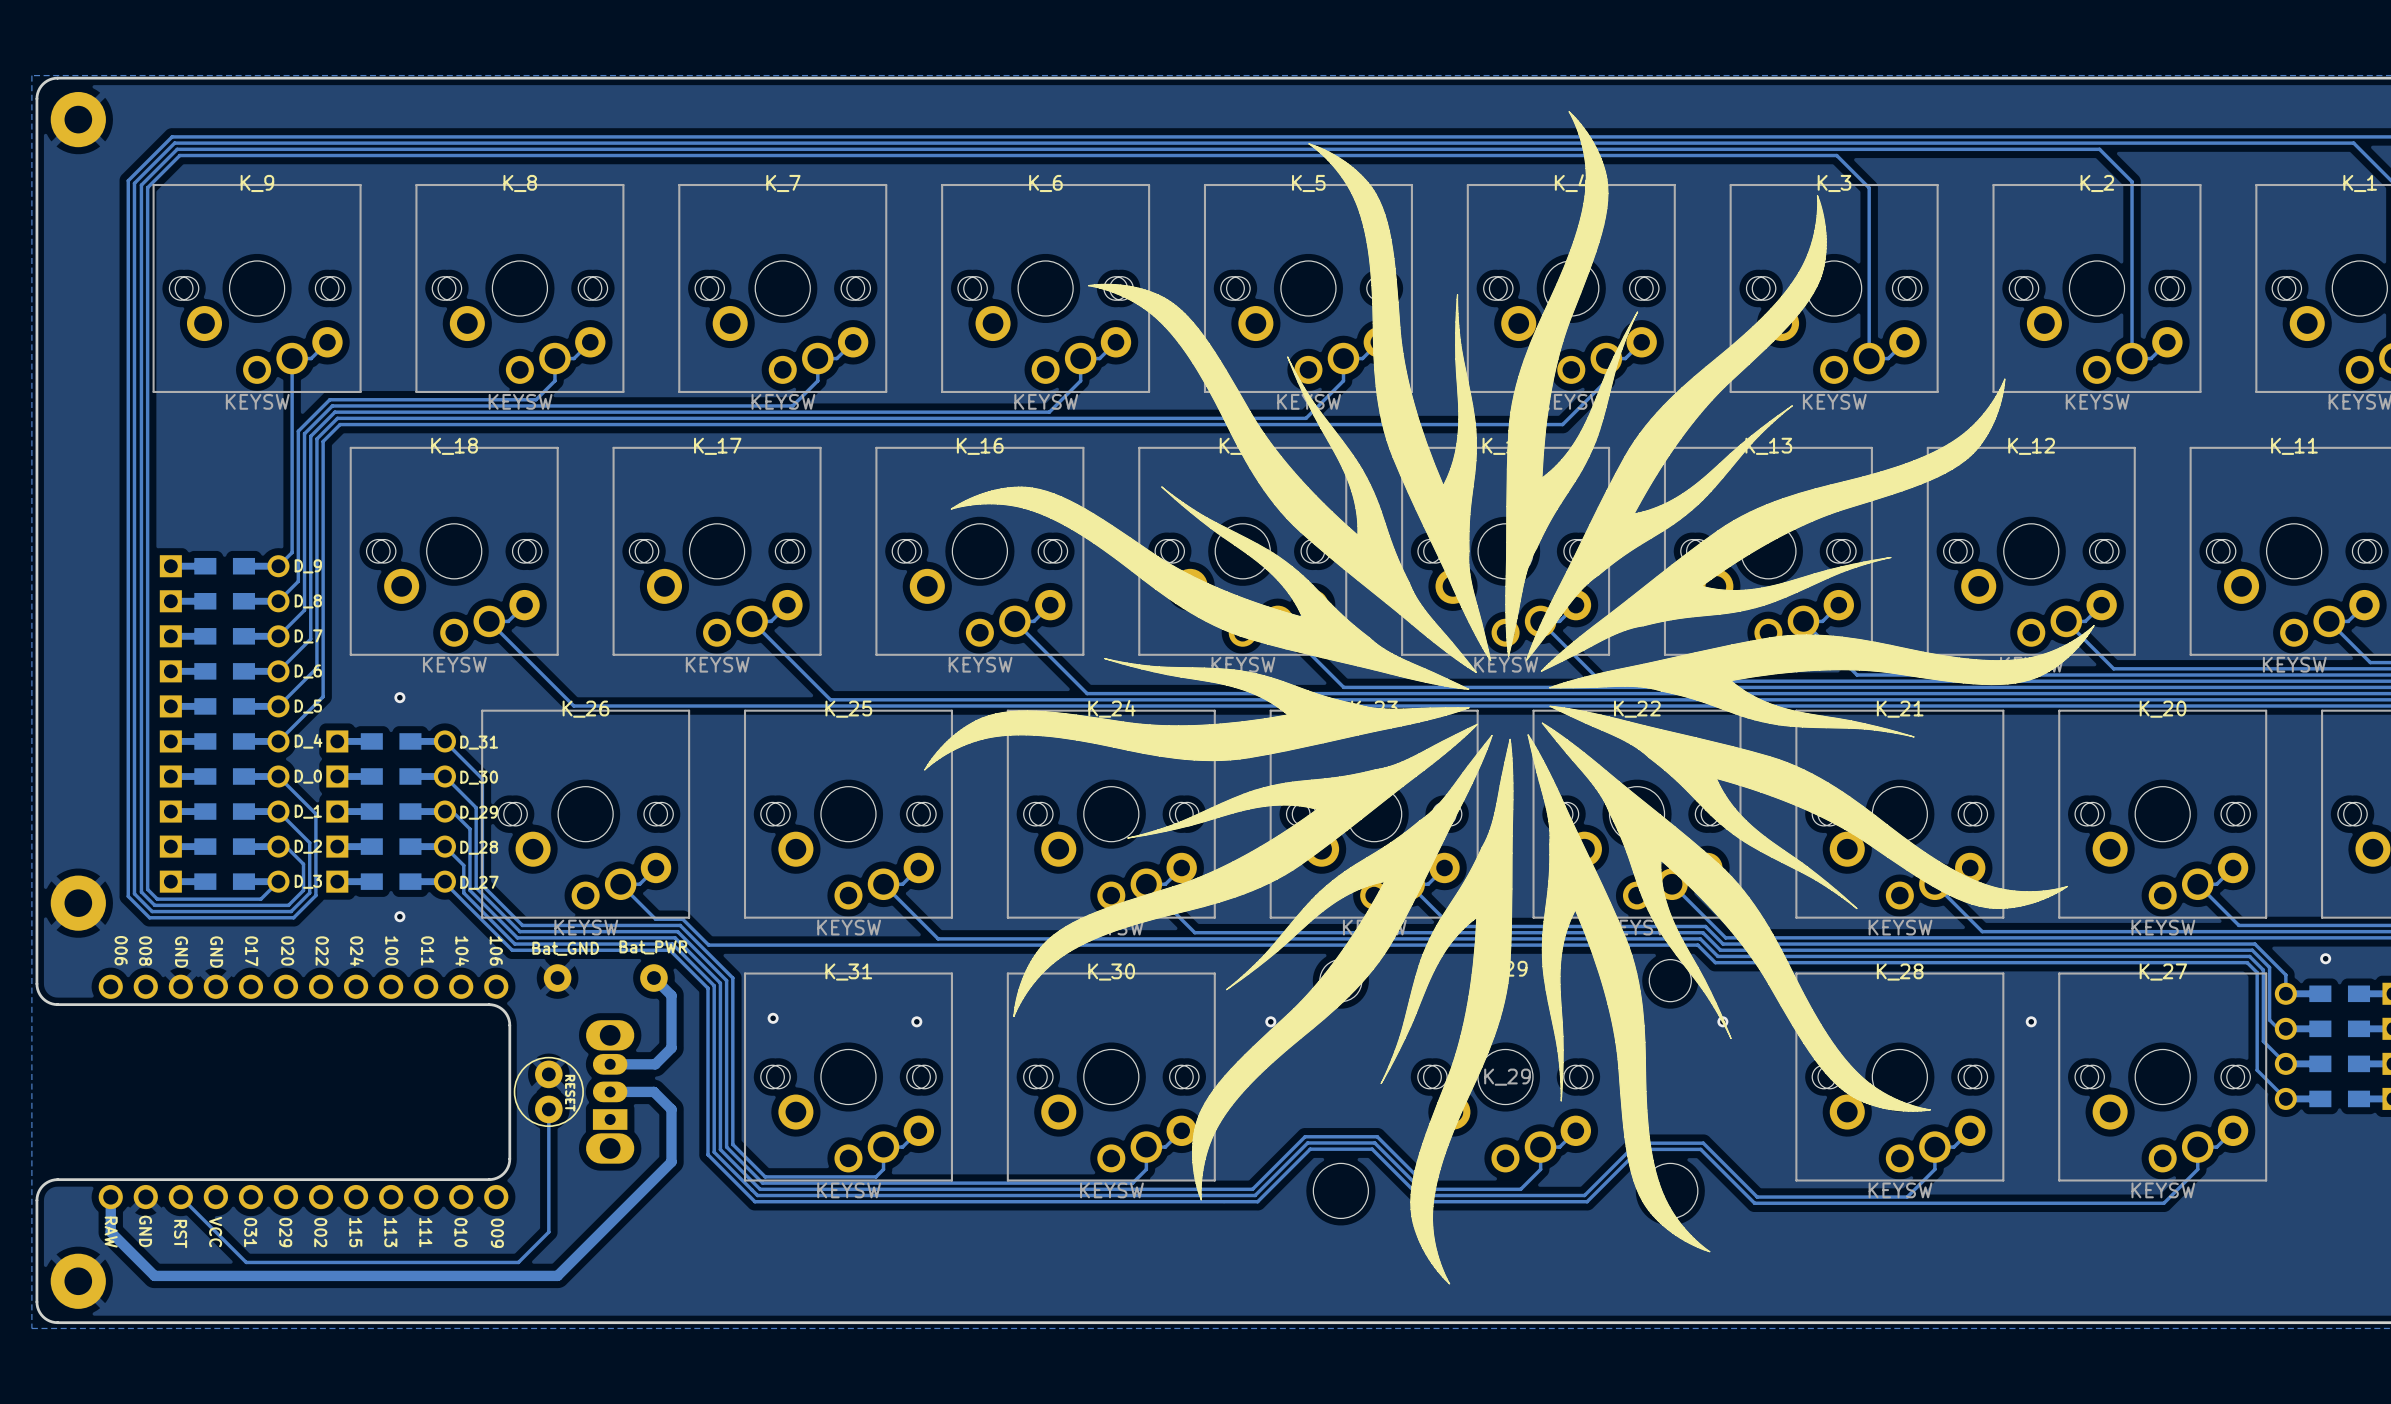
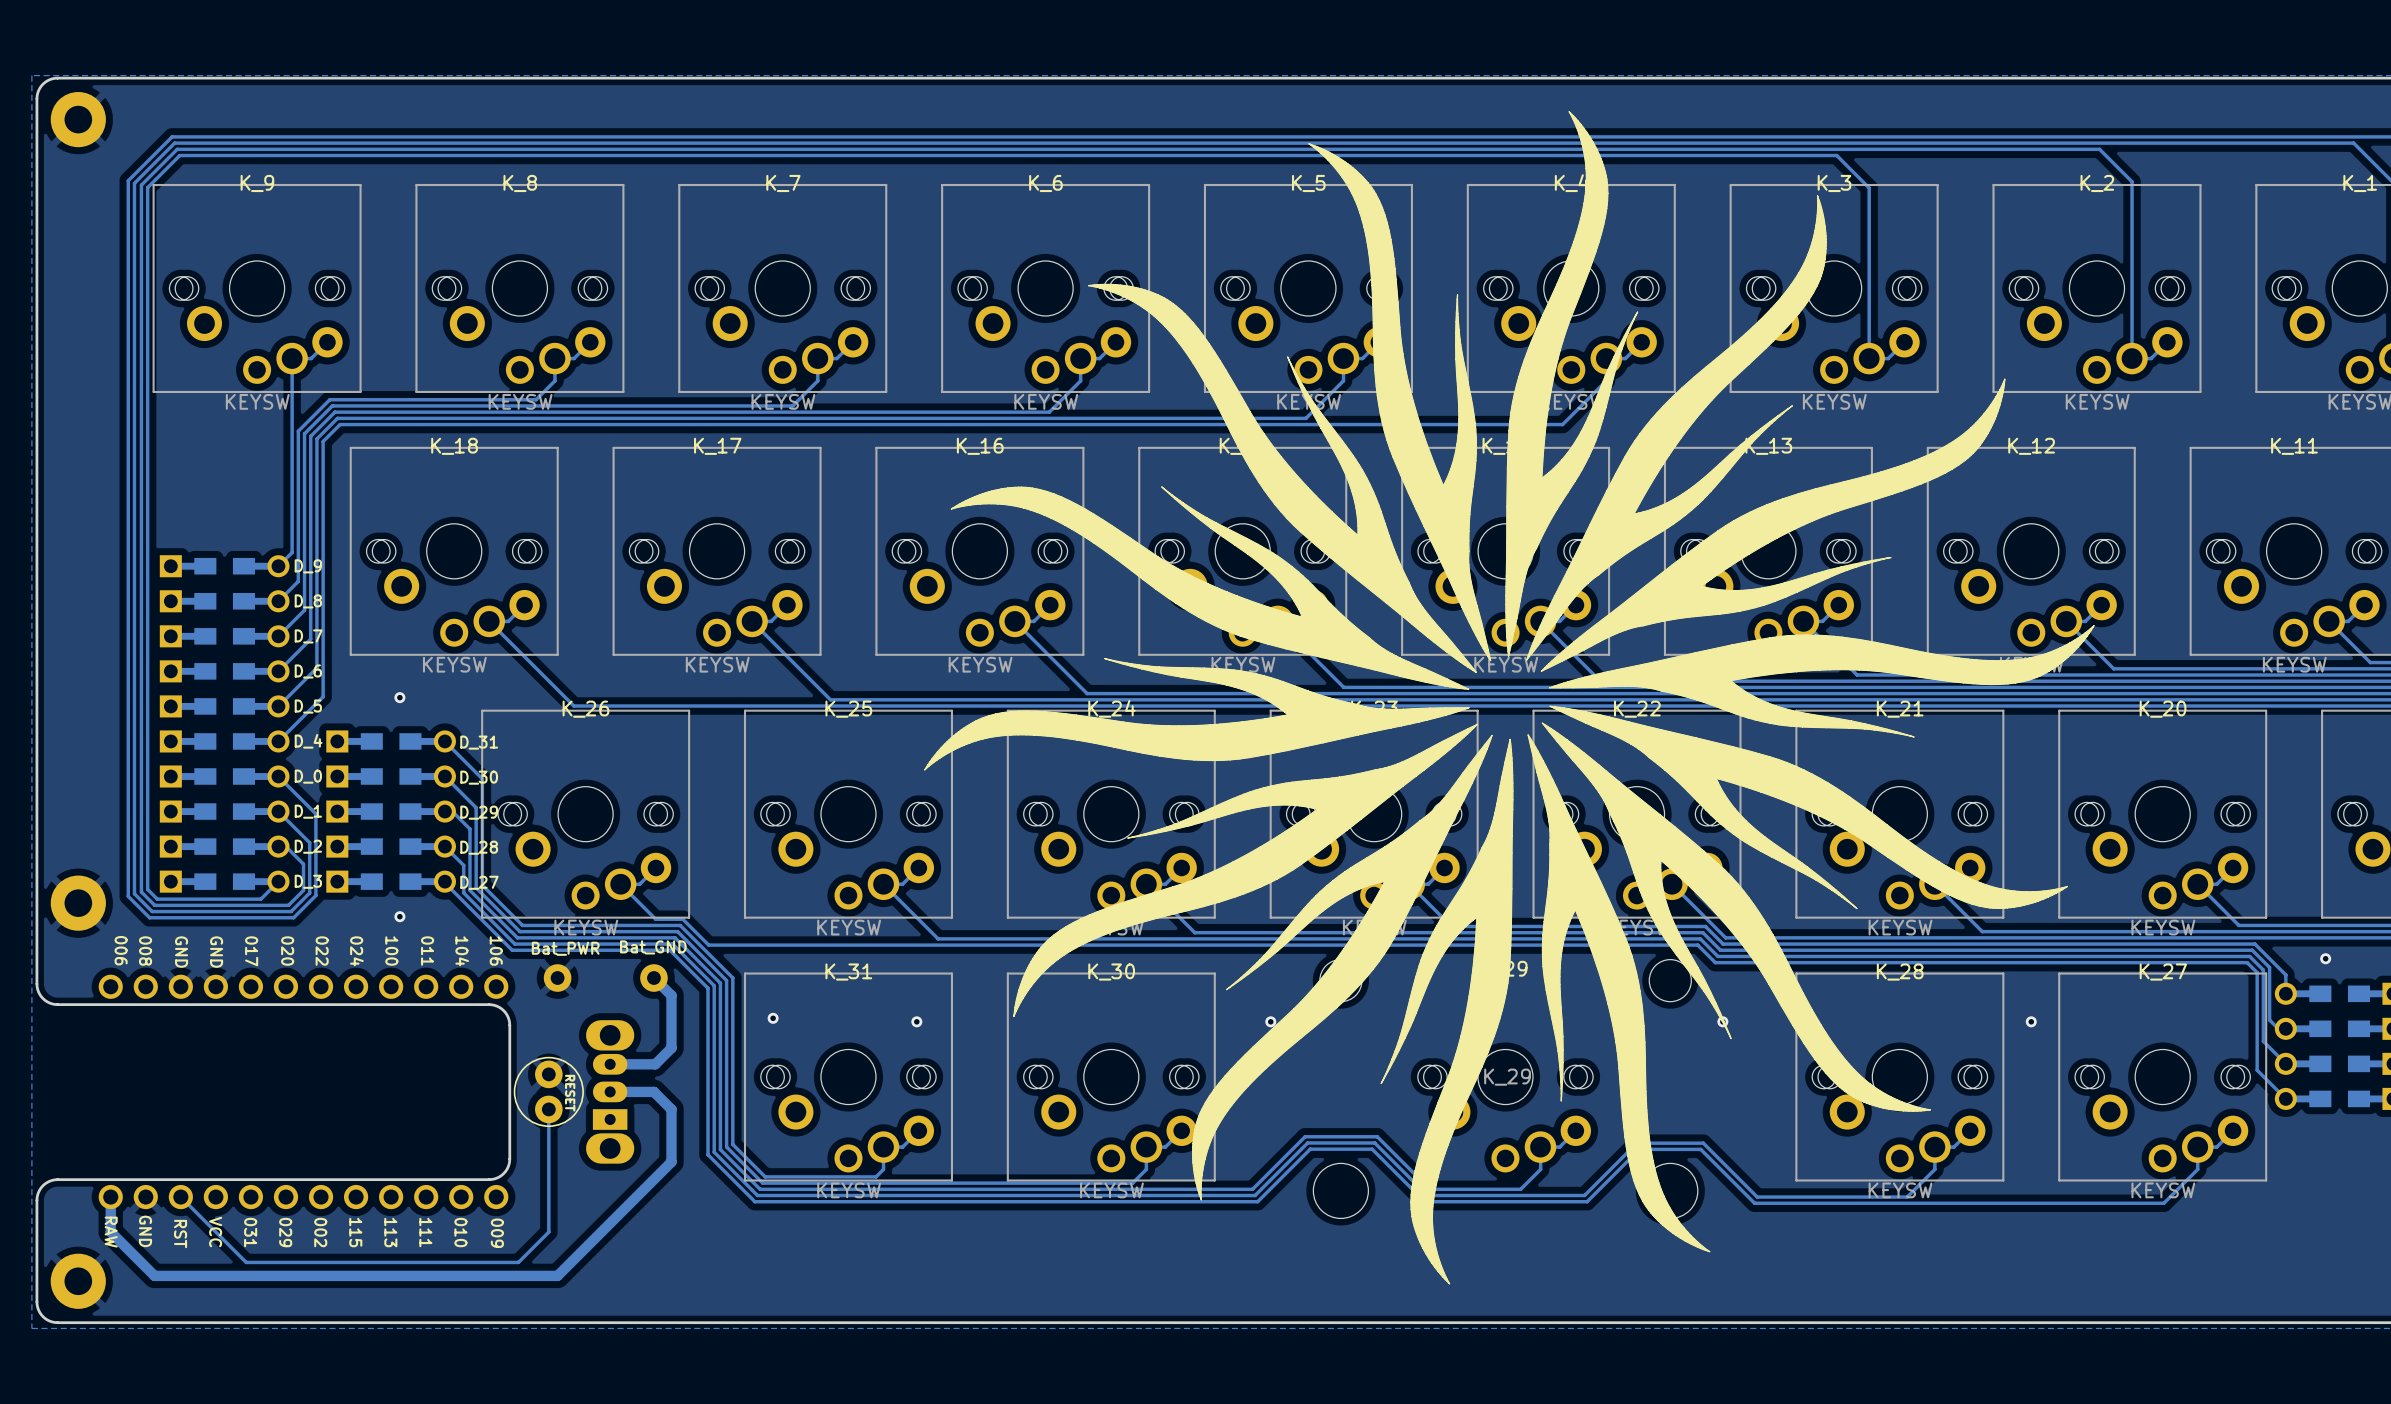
text: Bat_PWR (653, 947) -> Bat_GND (653, 947)
text: Bat_GND (565, 948) -> Bat_PWR (565, 948)

